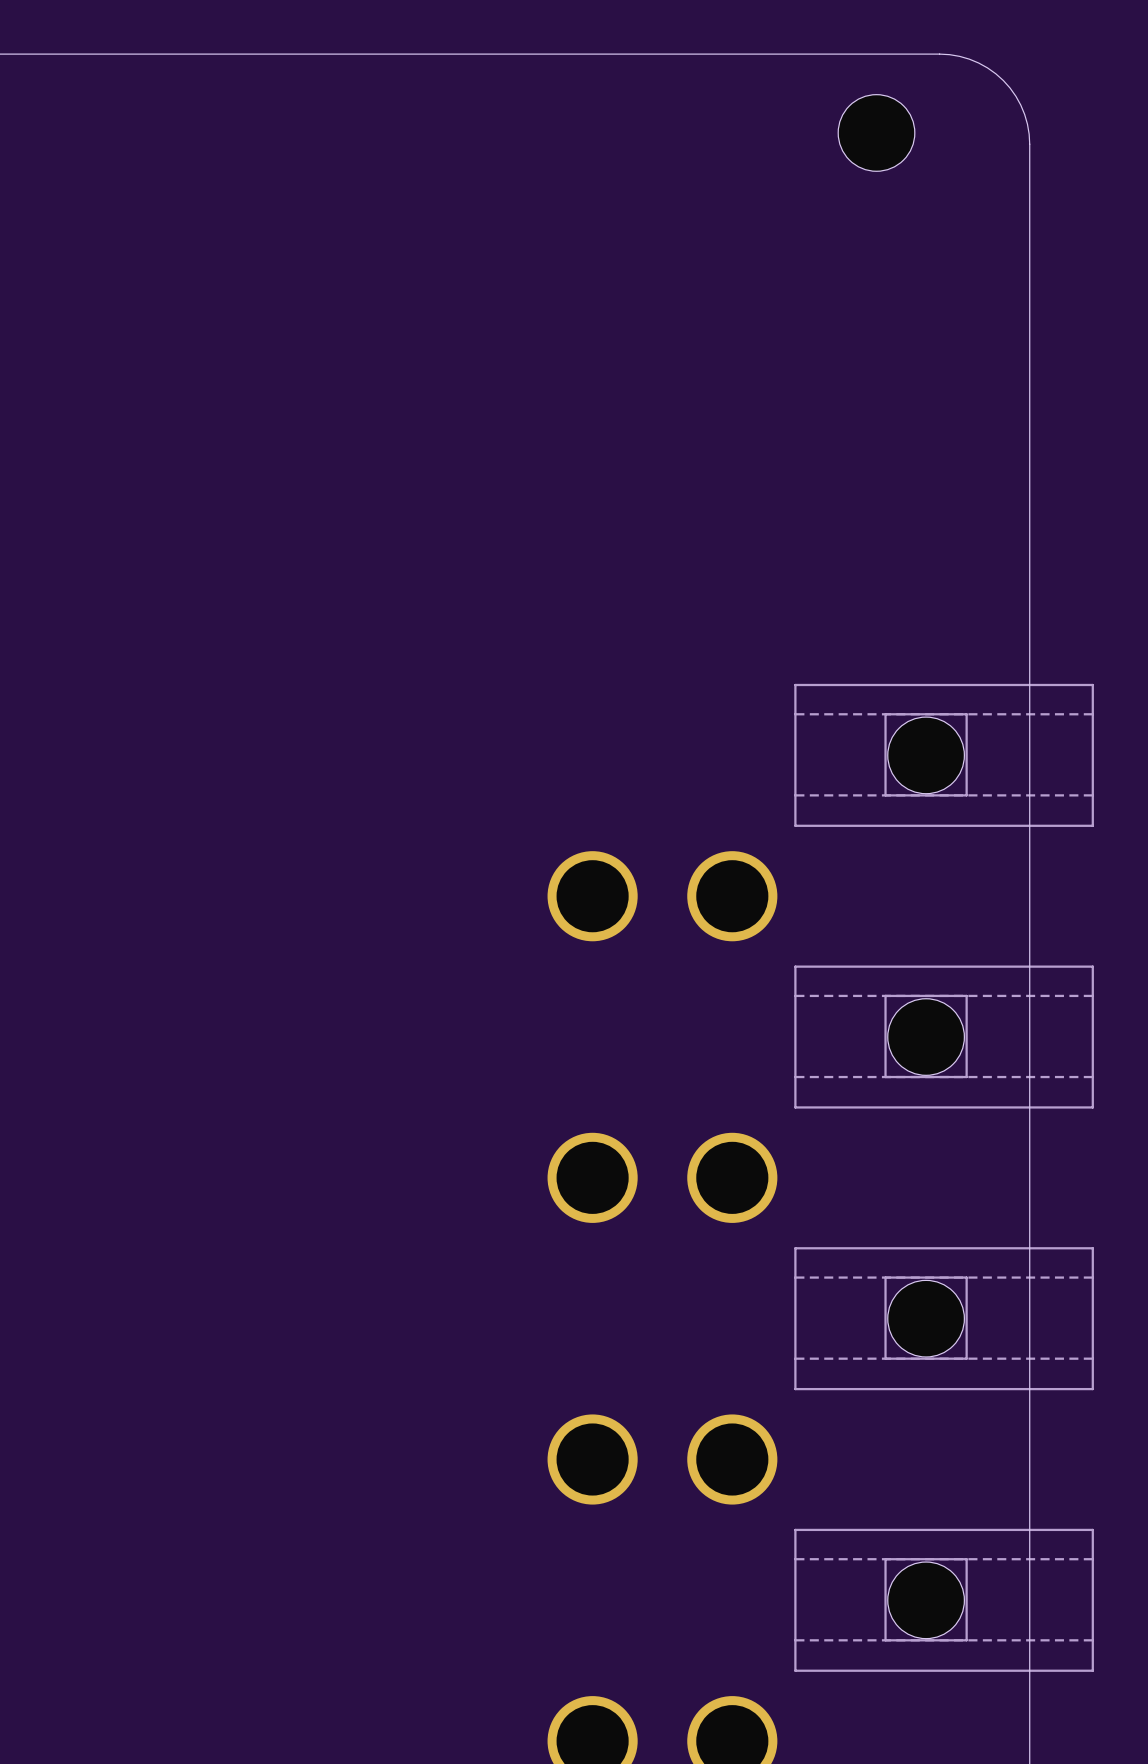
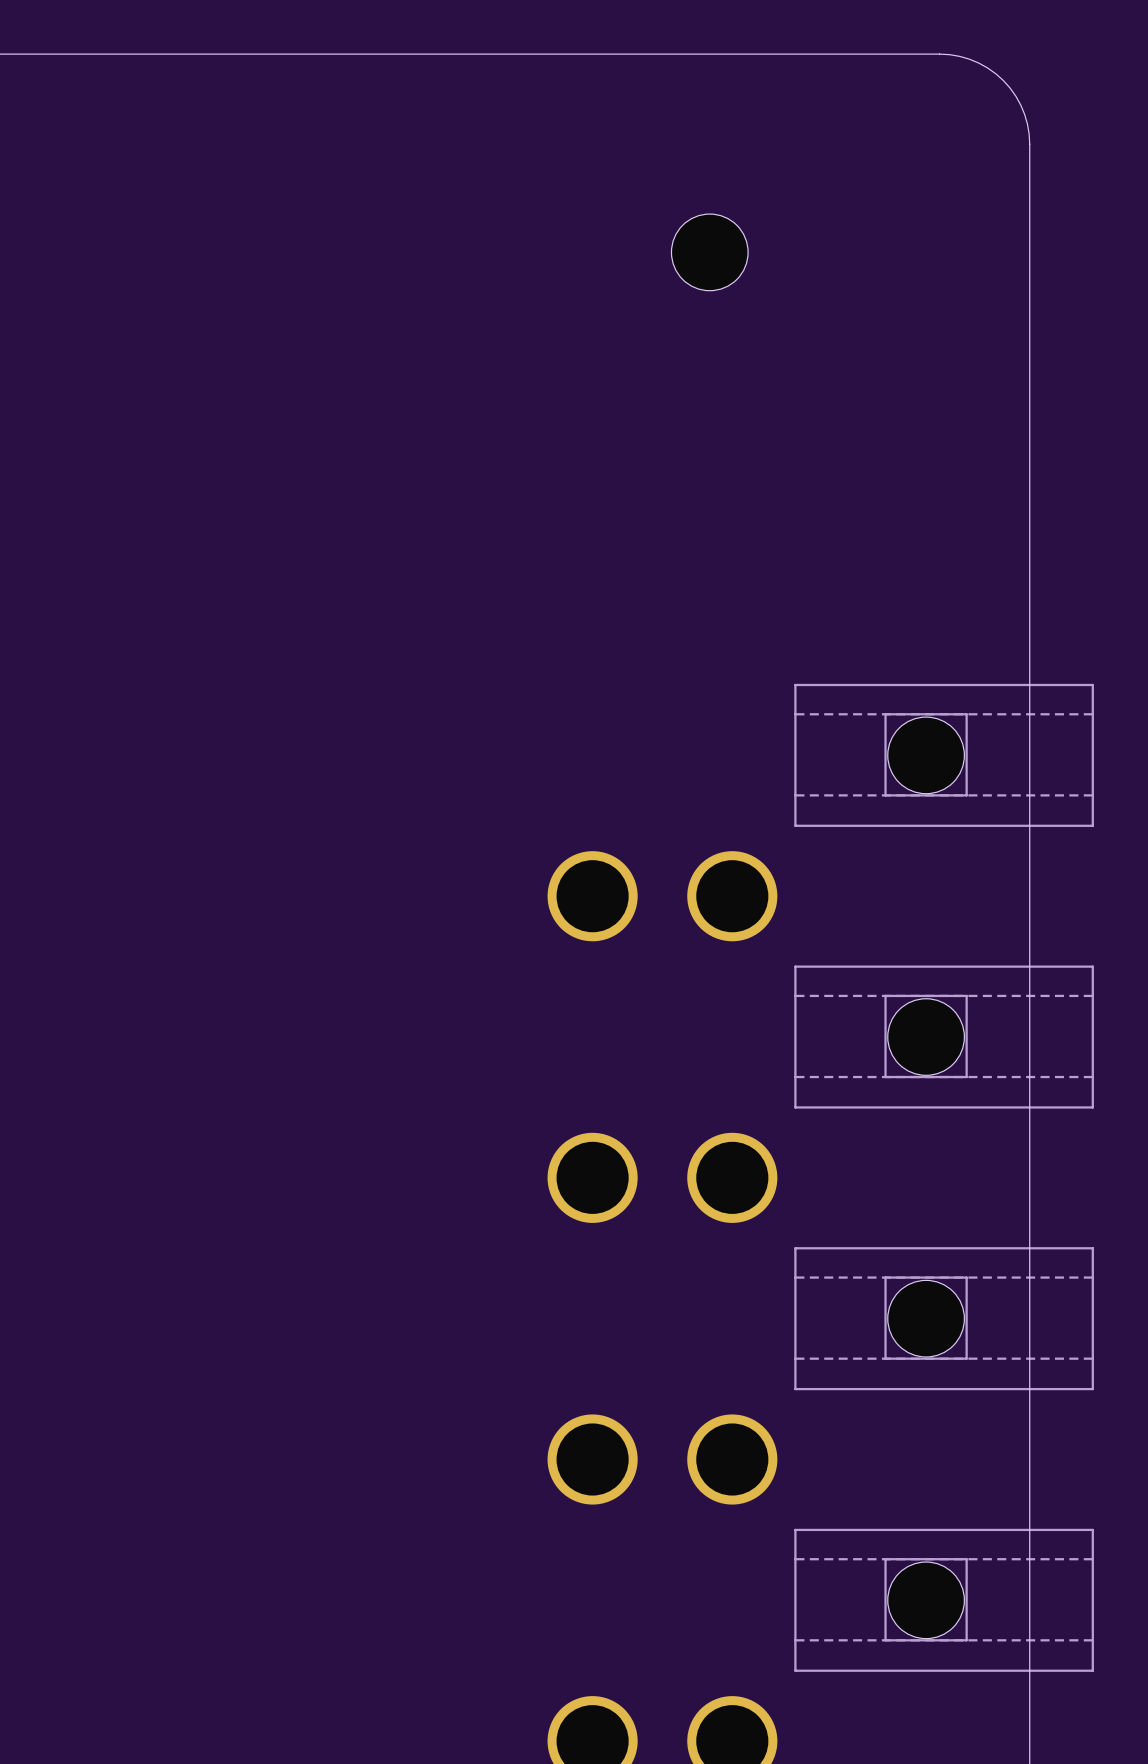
part position: (876, 132) -> (709, 252)

